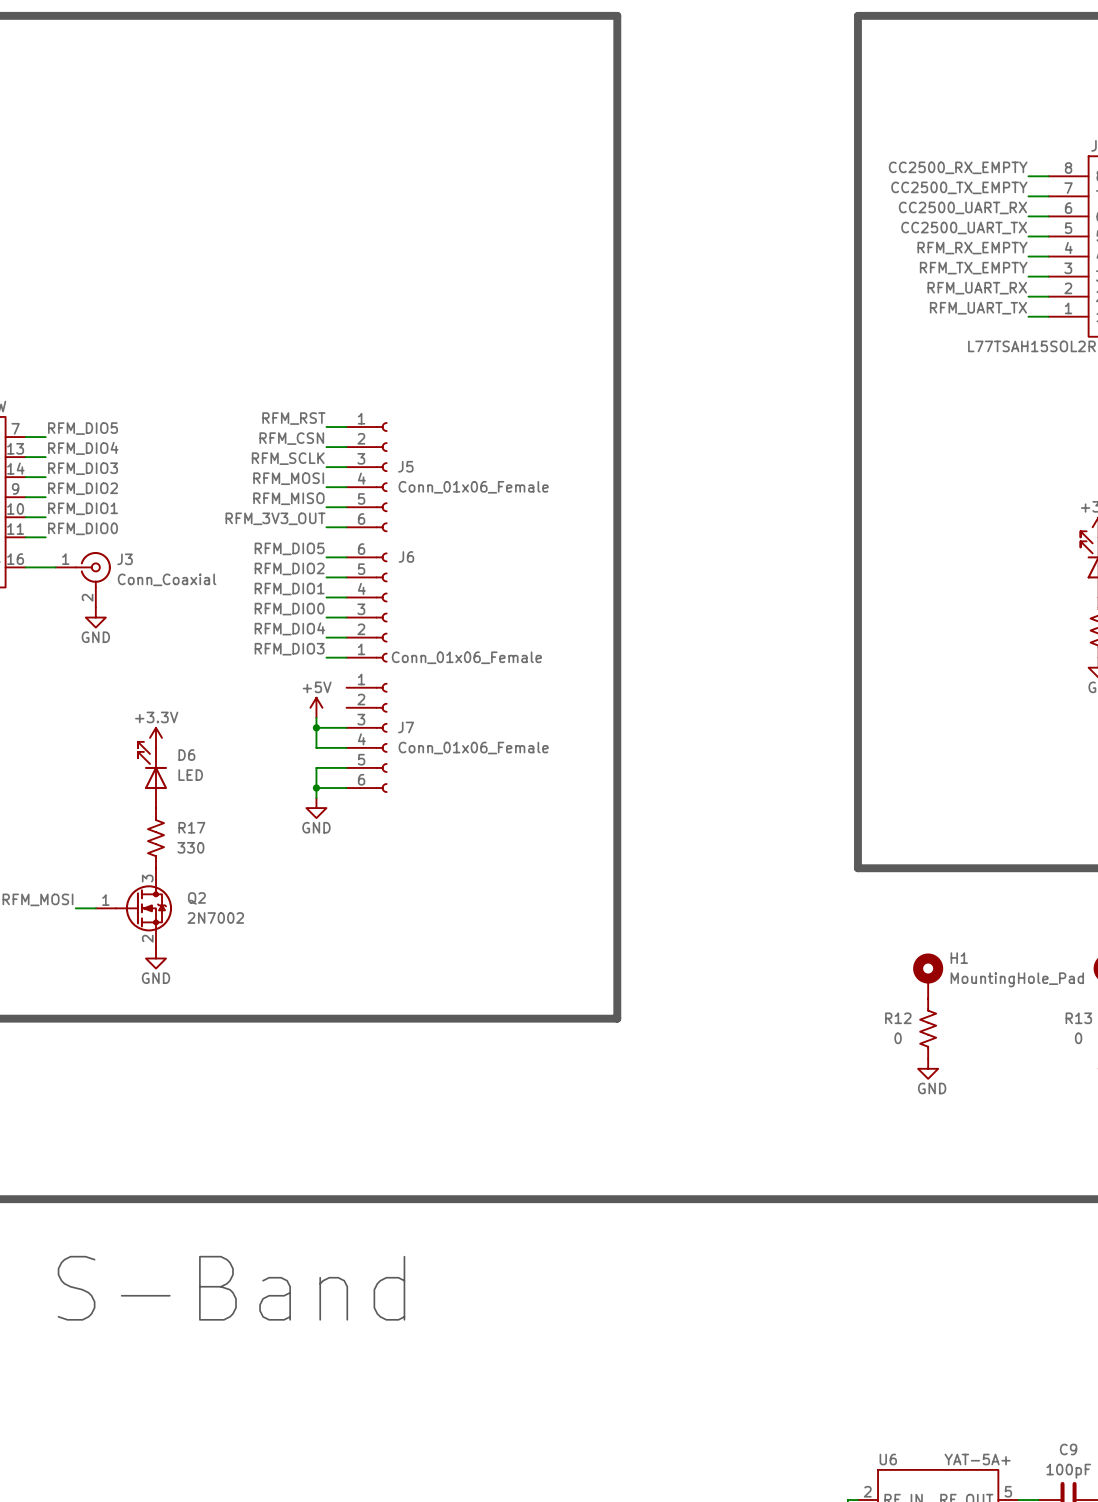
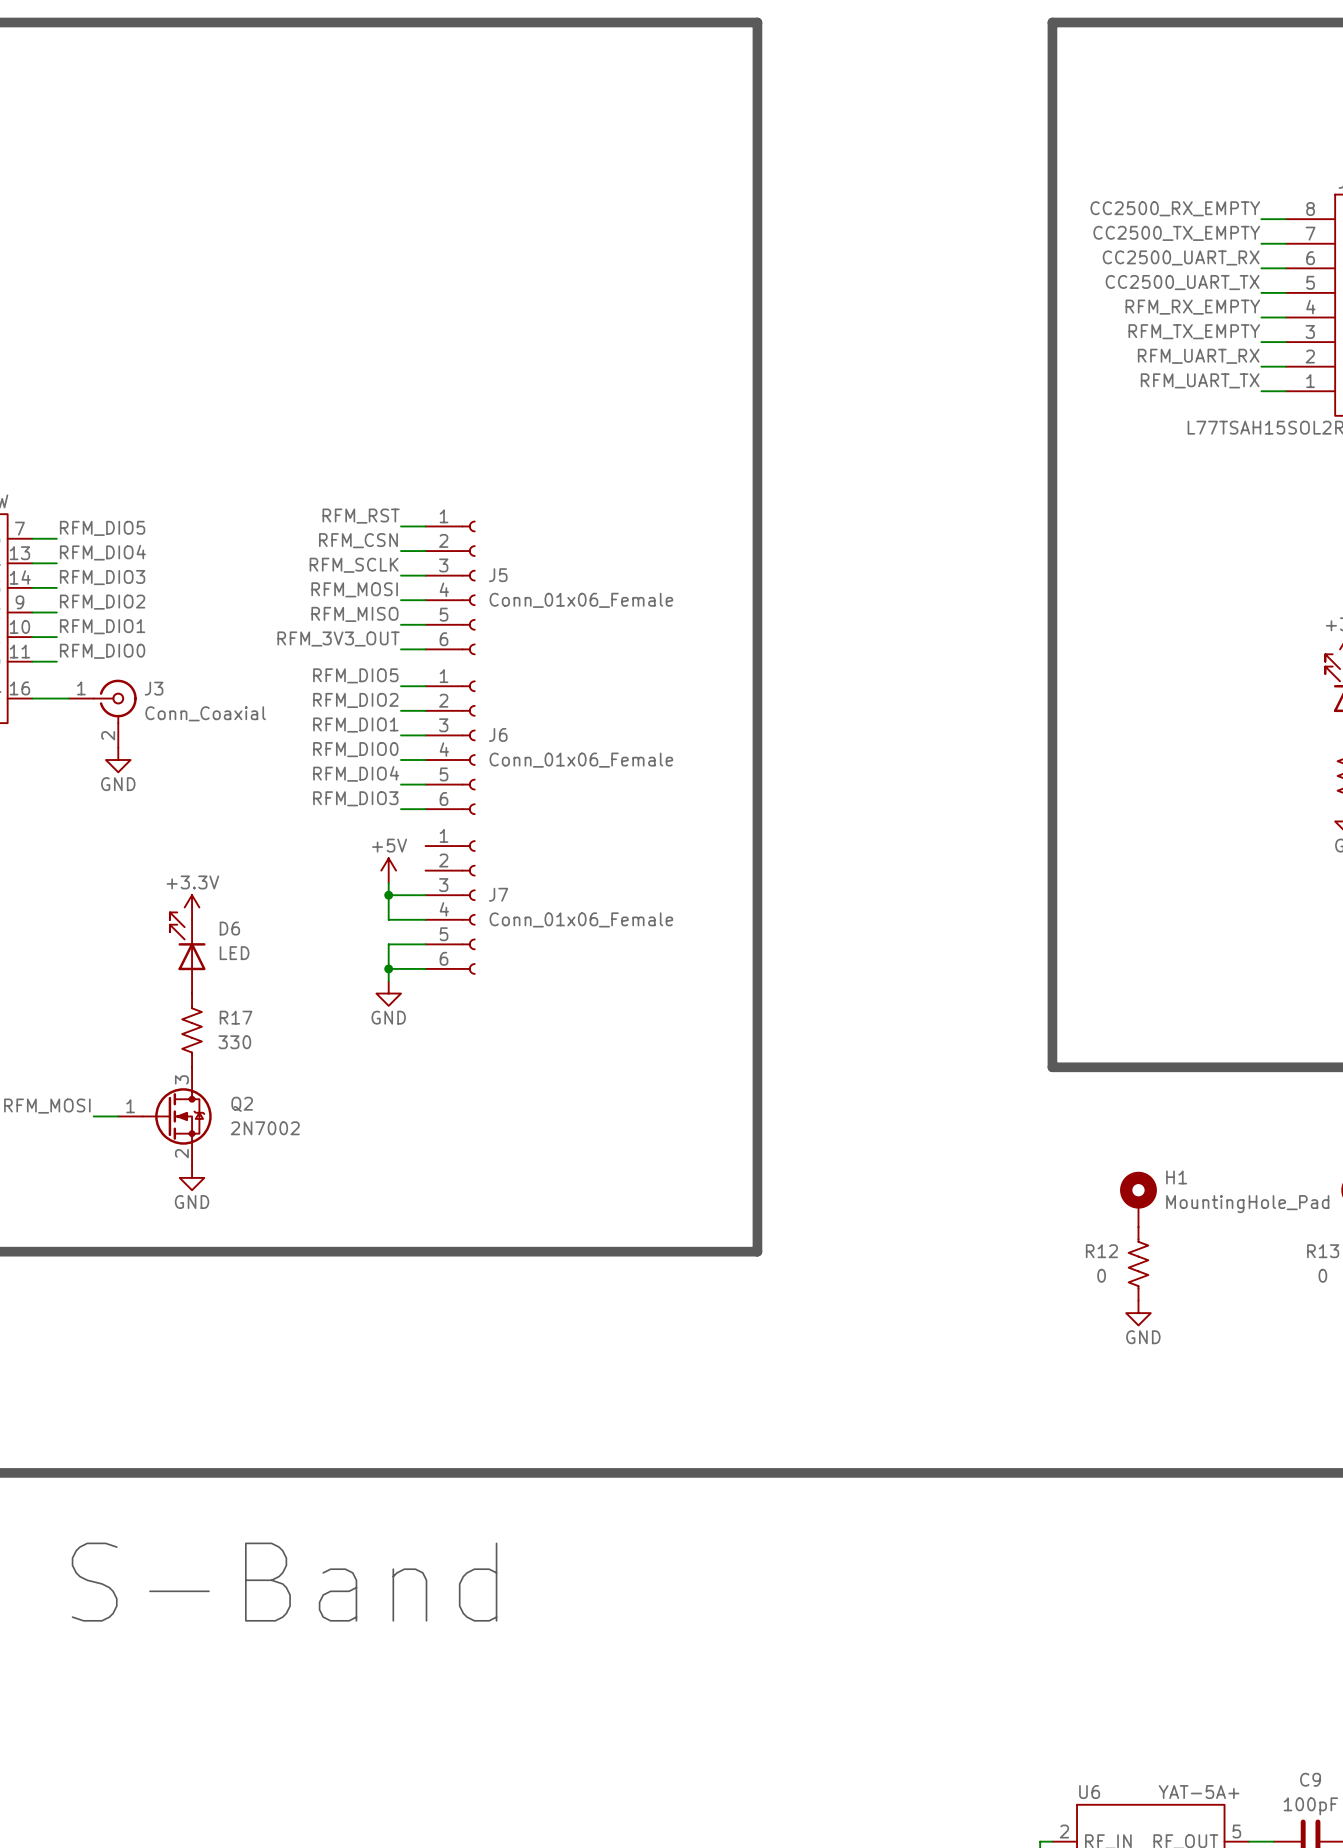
J6 name position: J6 (406, 557) -> J6 (498, 734)
J6 flip: as is (381, 607) -> up-down (468, 747)
J6 value position: Conn_01x06_Female (466, 657) -> Conn_01x06_Female (581, 760)

